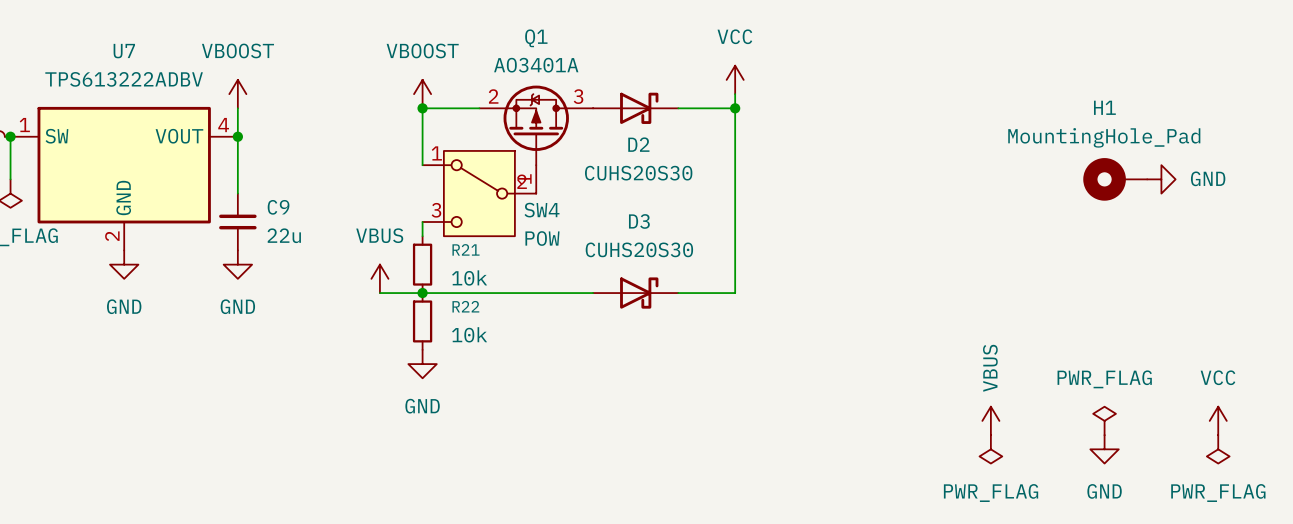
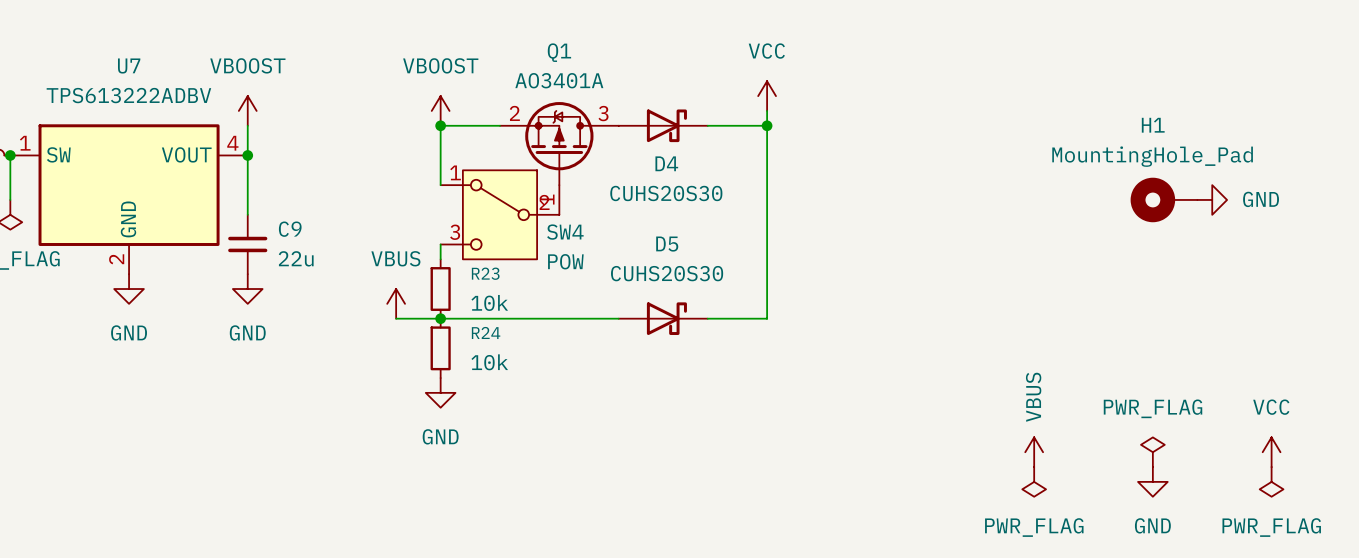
D2 name: D2 (638, 144) -> D4 (666, 163)
D3 name: D3 (639, 221) -> D5 (667, 244)
R21 name: R21 (466, 249) -> R23 (485, 273)
R22 name: R22 (465, 306) -> R24 (486, 332)

